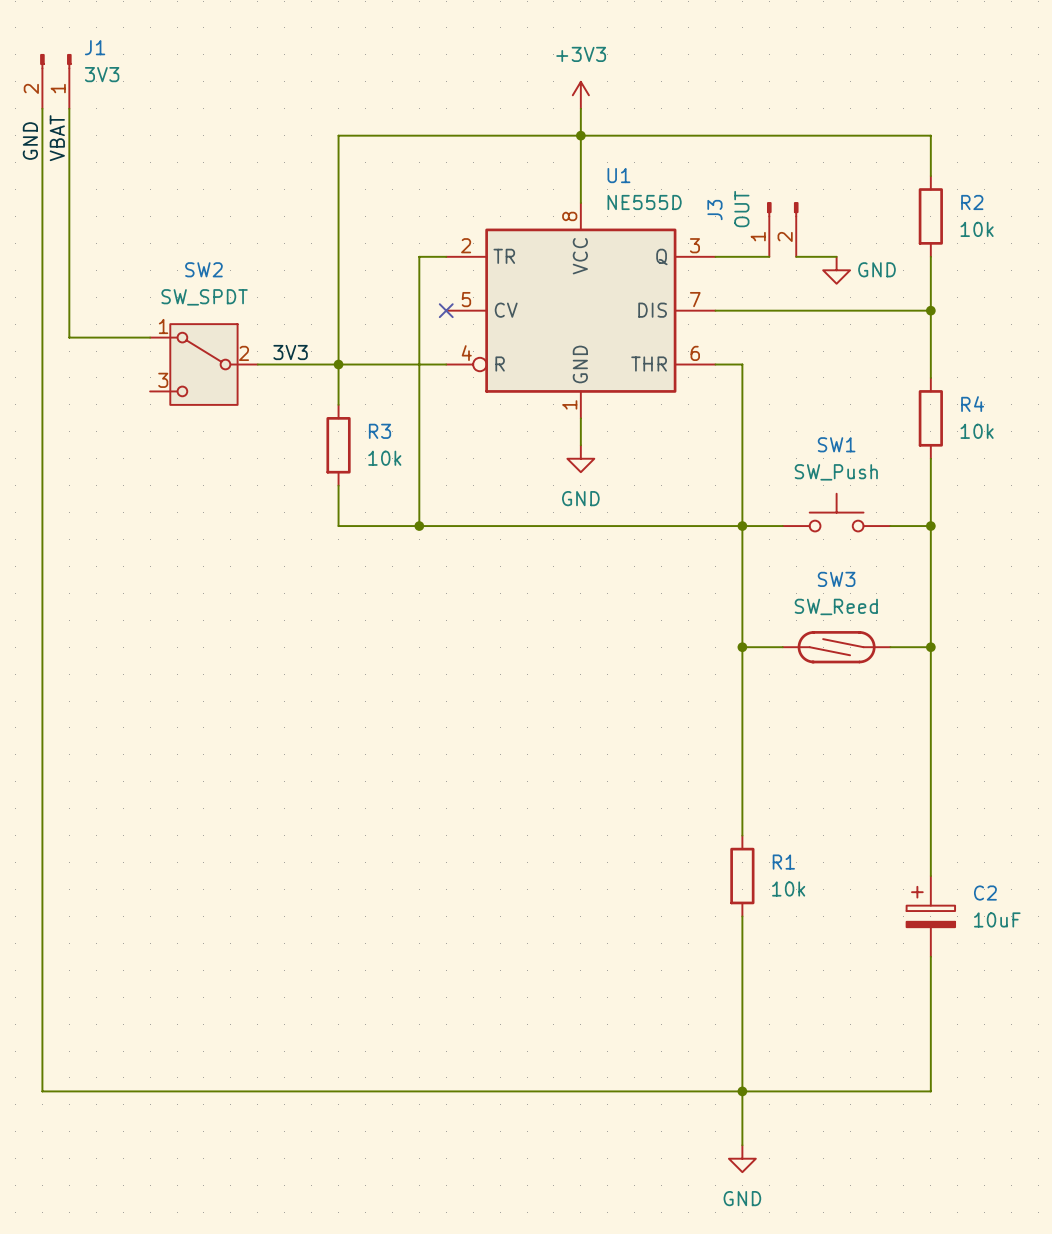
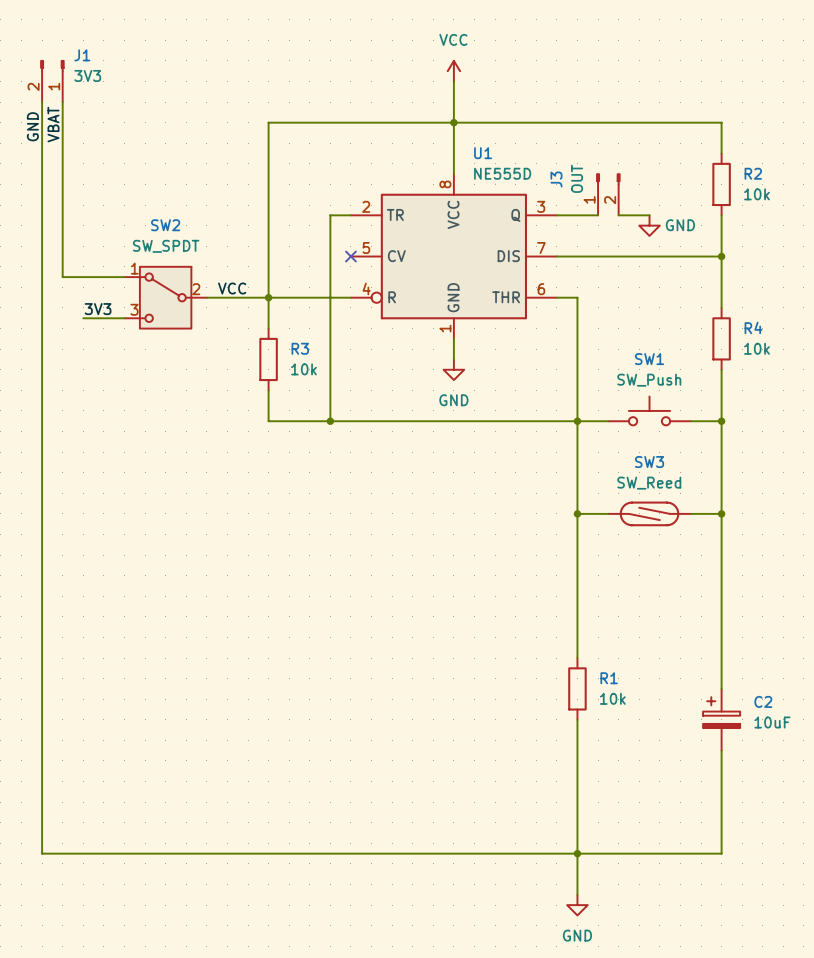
power symbol: none -> VCC (453, 71)
power symbol: +3V3 (580, 95) -> none
label: 3V3 (290, 352) -> VCC (232, 288)
label: none -> 3V3 (98, 309)
wire: none -> (83, 318) (124, 318)

